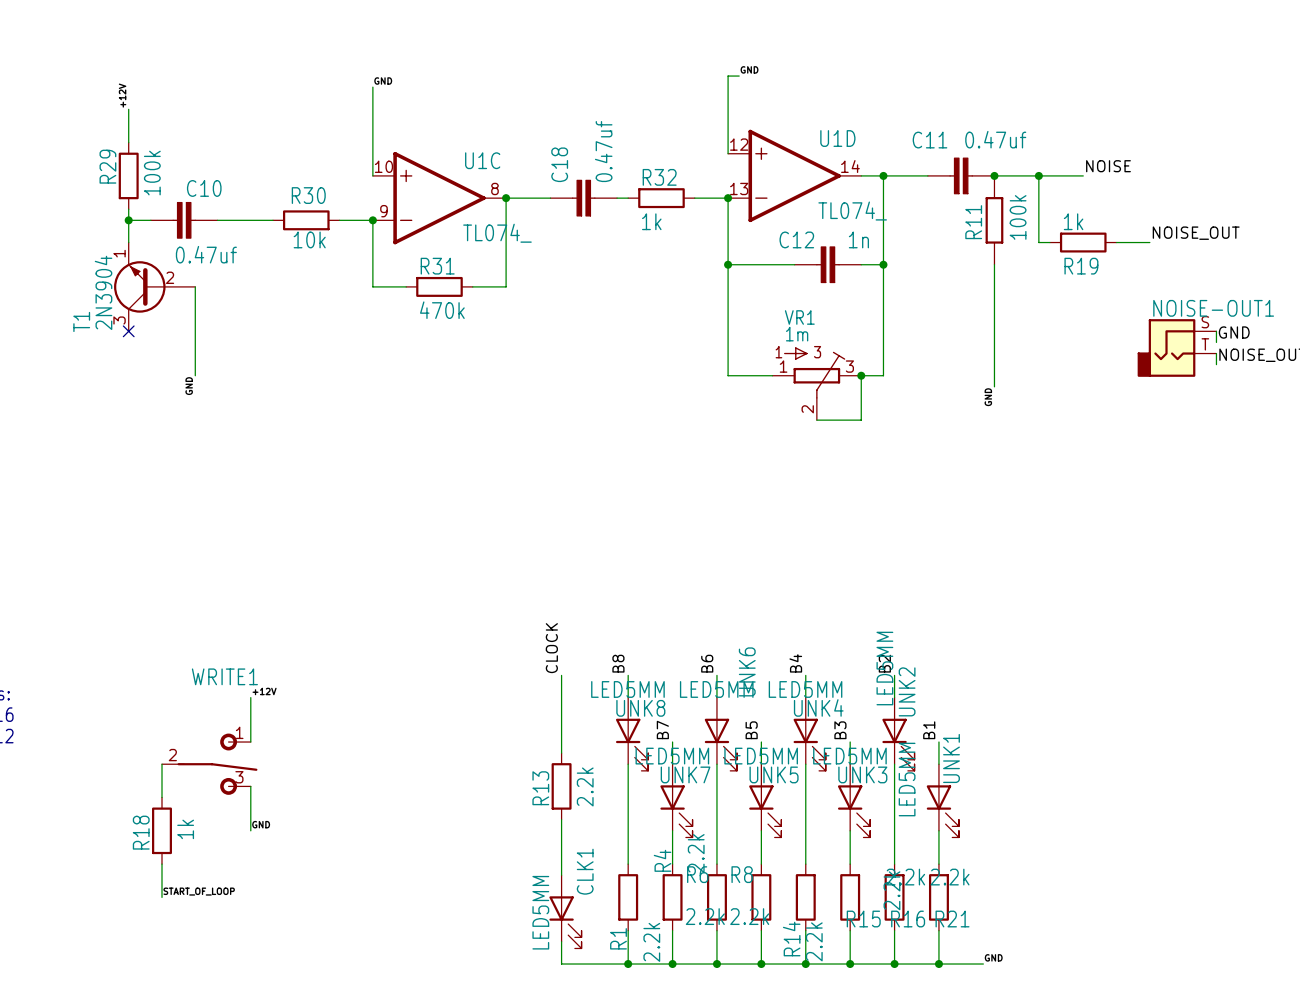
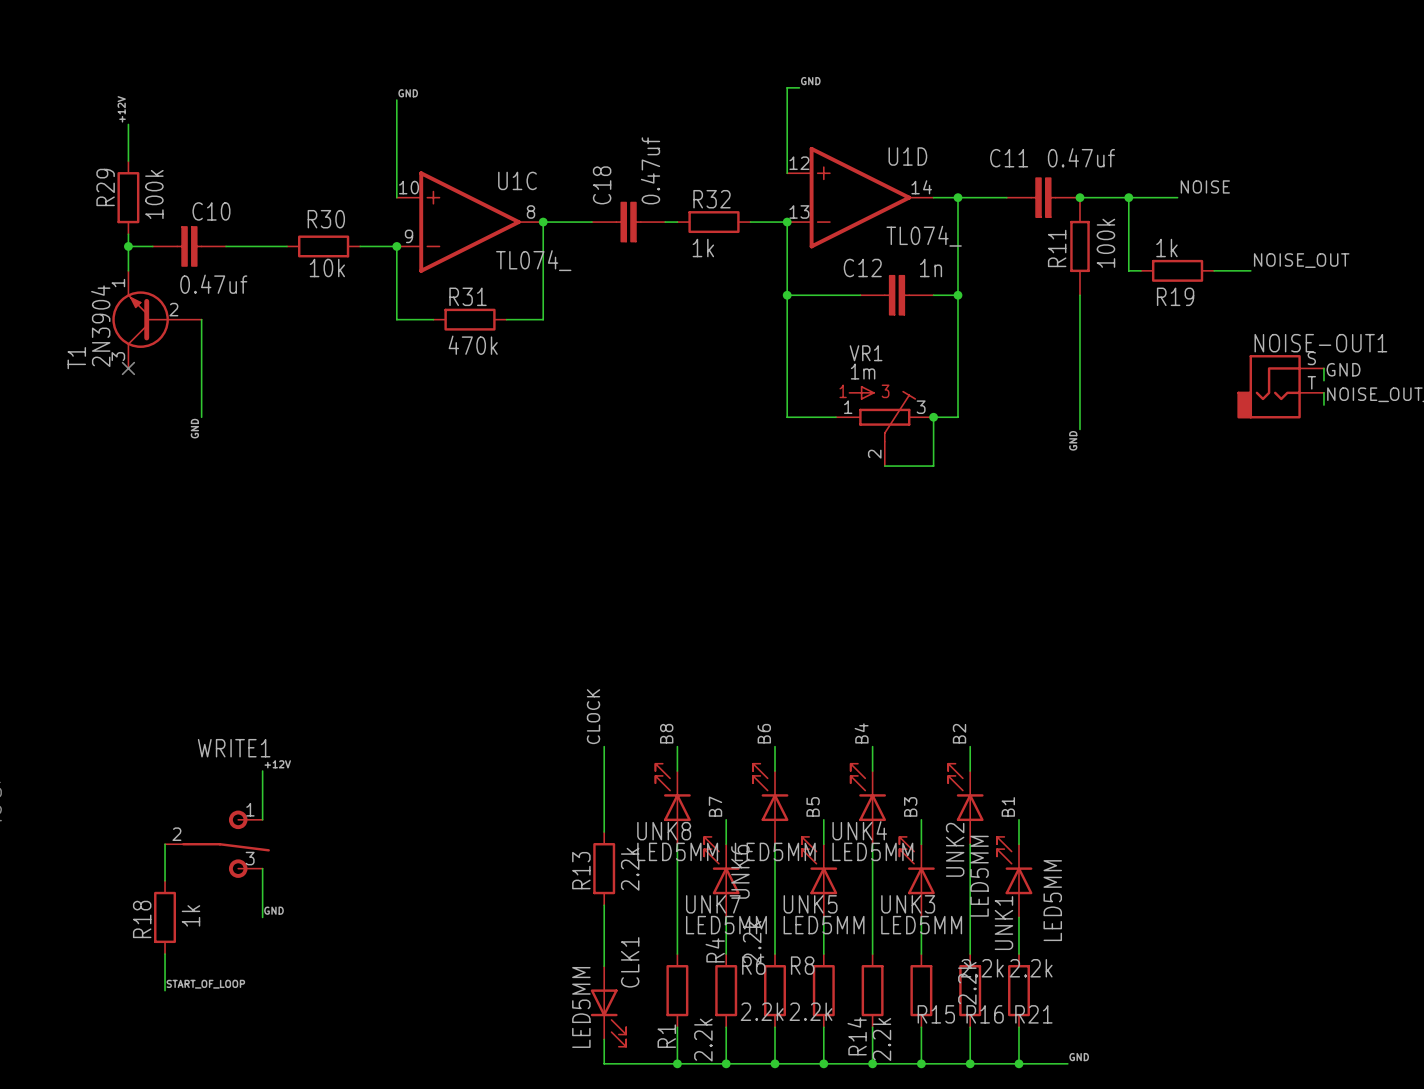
UNK8 rotation: 0° (632, 744) -> 180° (673, 792)
UNK6 rotation: 0° (720, 744) -> 180° (770, 792)
UNK4 rotation: 0° (809, 744) -> 180° (868, 792)
UNK2 rotation: 0° (898, 744) -> 180° (965, 792)
UNK7 rotation: 0° (676, 811) -> 180° (721, 865)
UNK5 rotation: 0° (765, 811) -> 180° (819, 865)
UNK3 rotation: 0° (854, 811) -> 180° (917, 865)
UNK1 rotation: 0° (942, 811) -> 180° (1014, 865)

